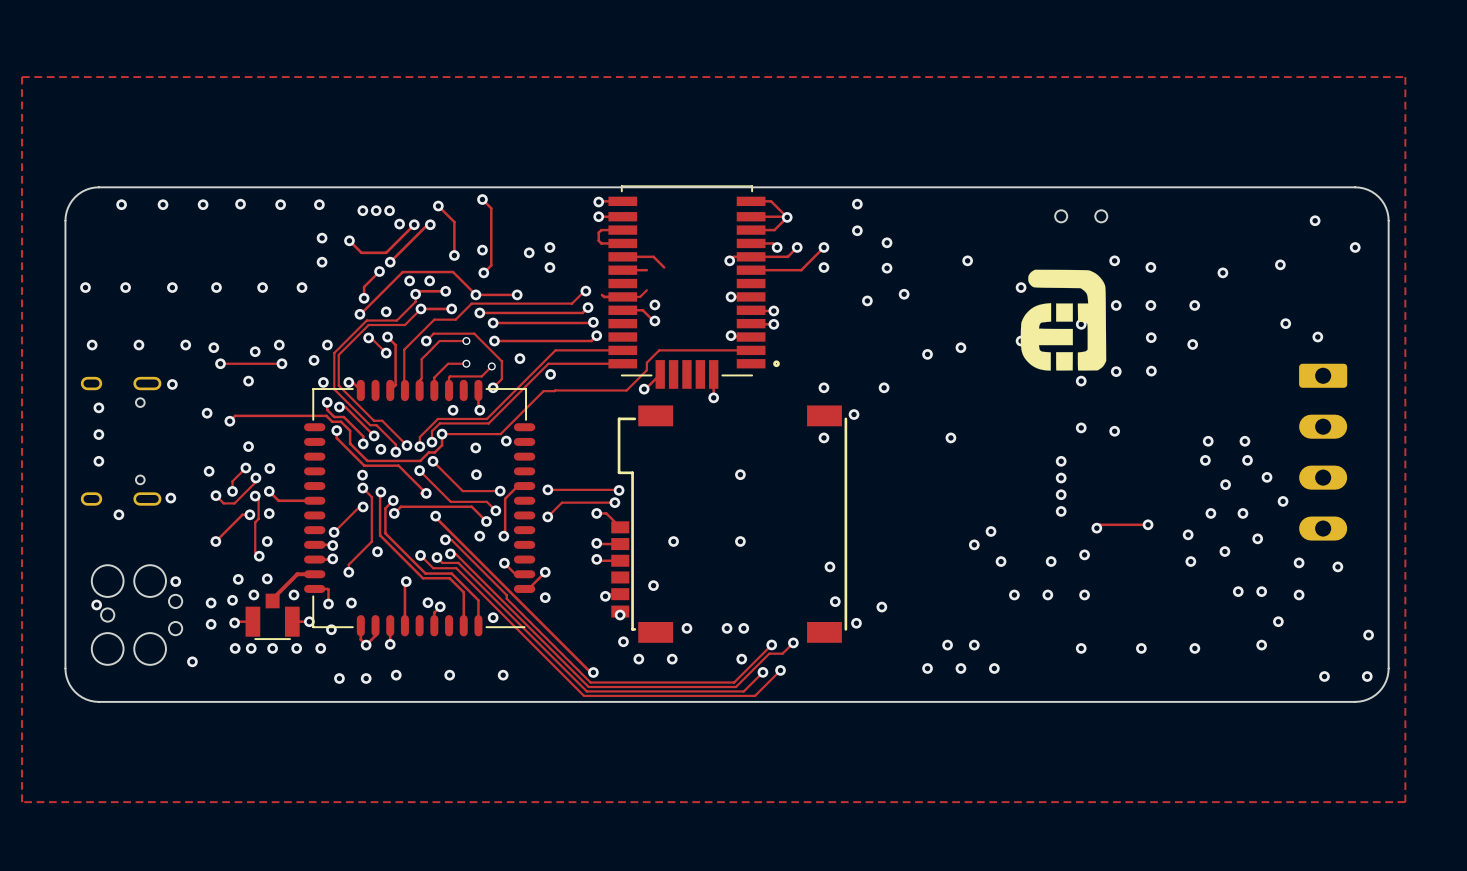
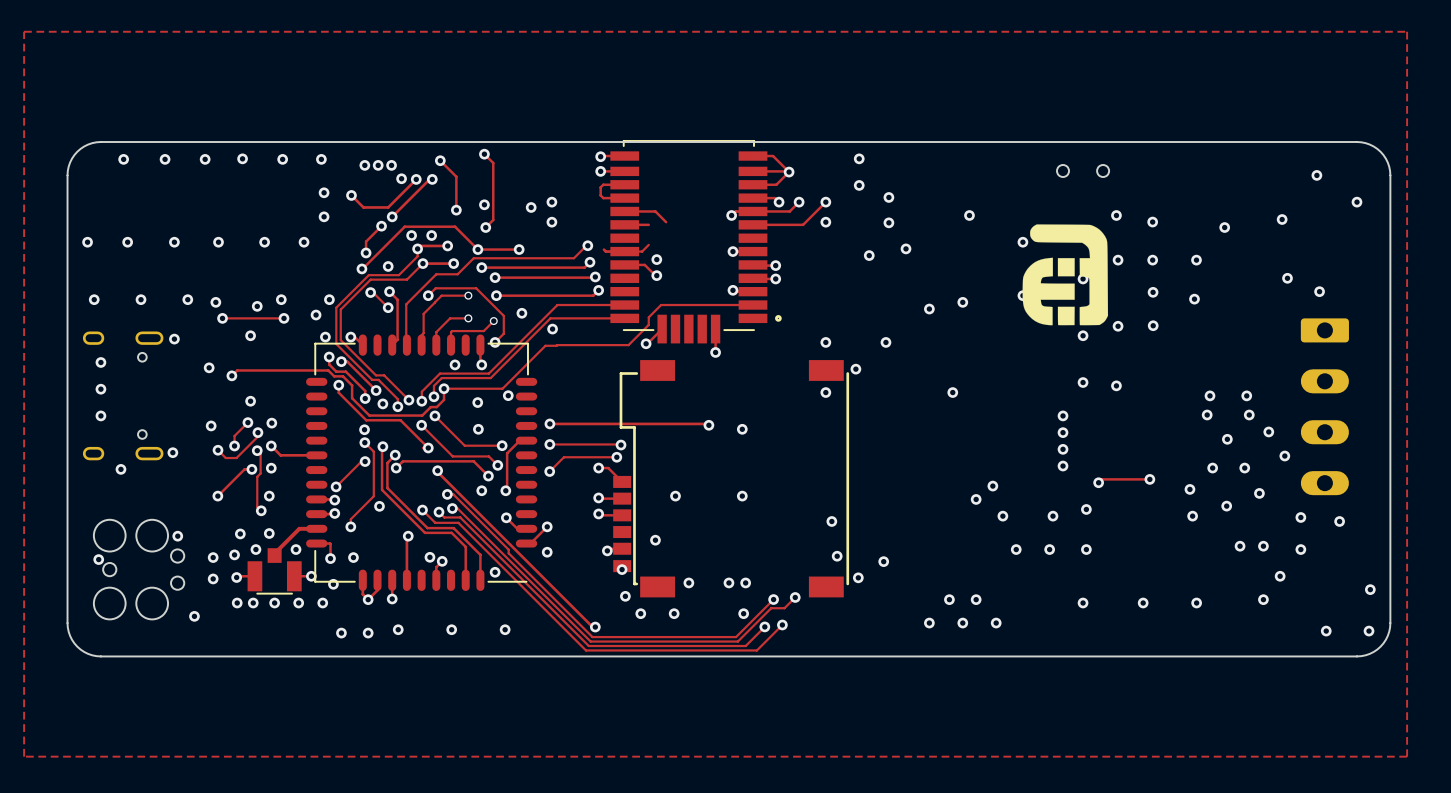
track: none -> (549, 423) (708, 425)
via: none -> (549, 423)
via: none -> (708, 425)

